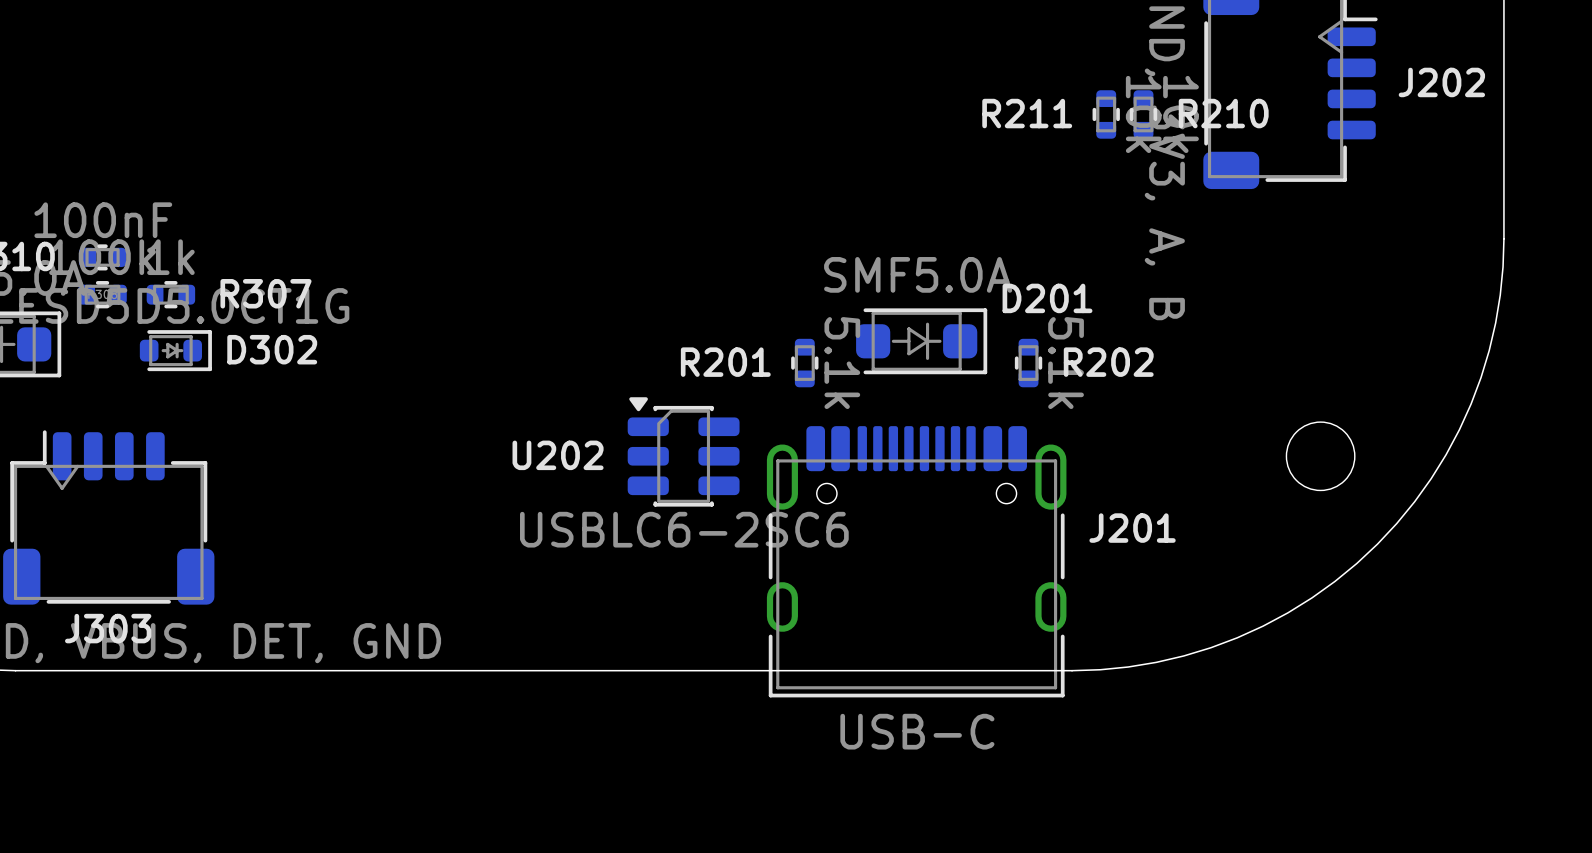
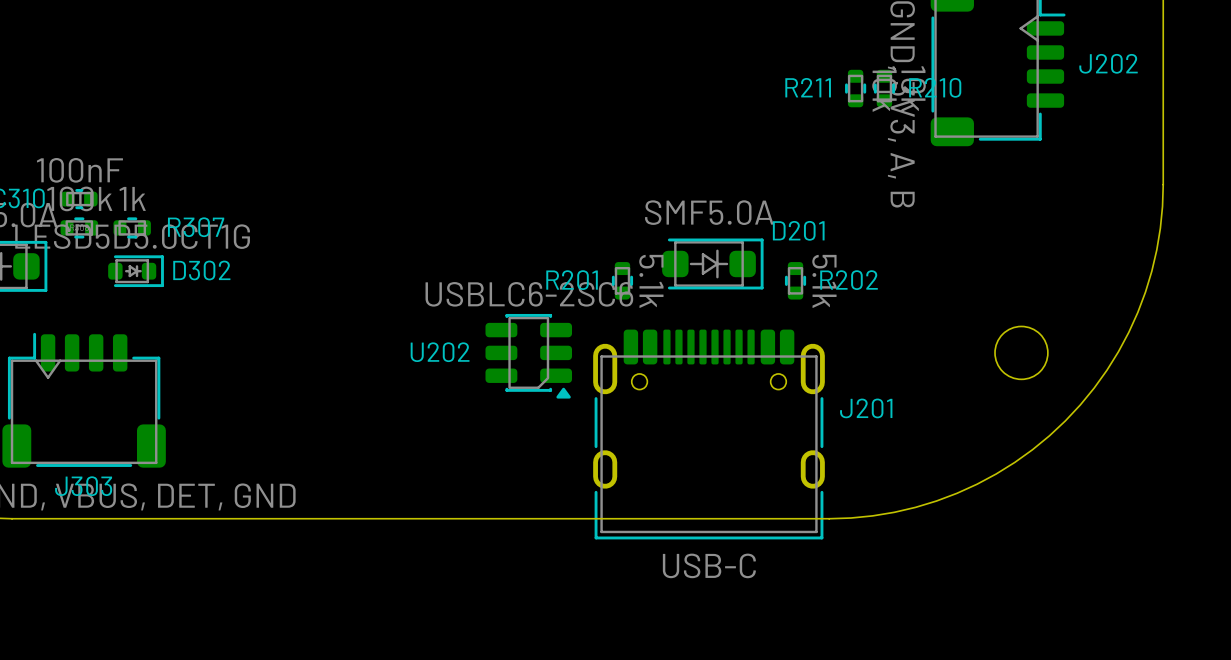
U202 rotation: 0° (683, 451) -> 180° (528, 356)

